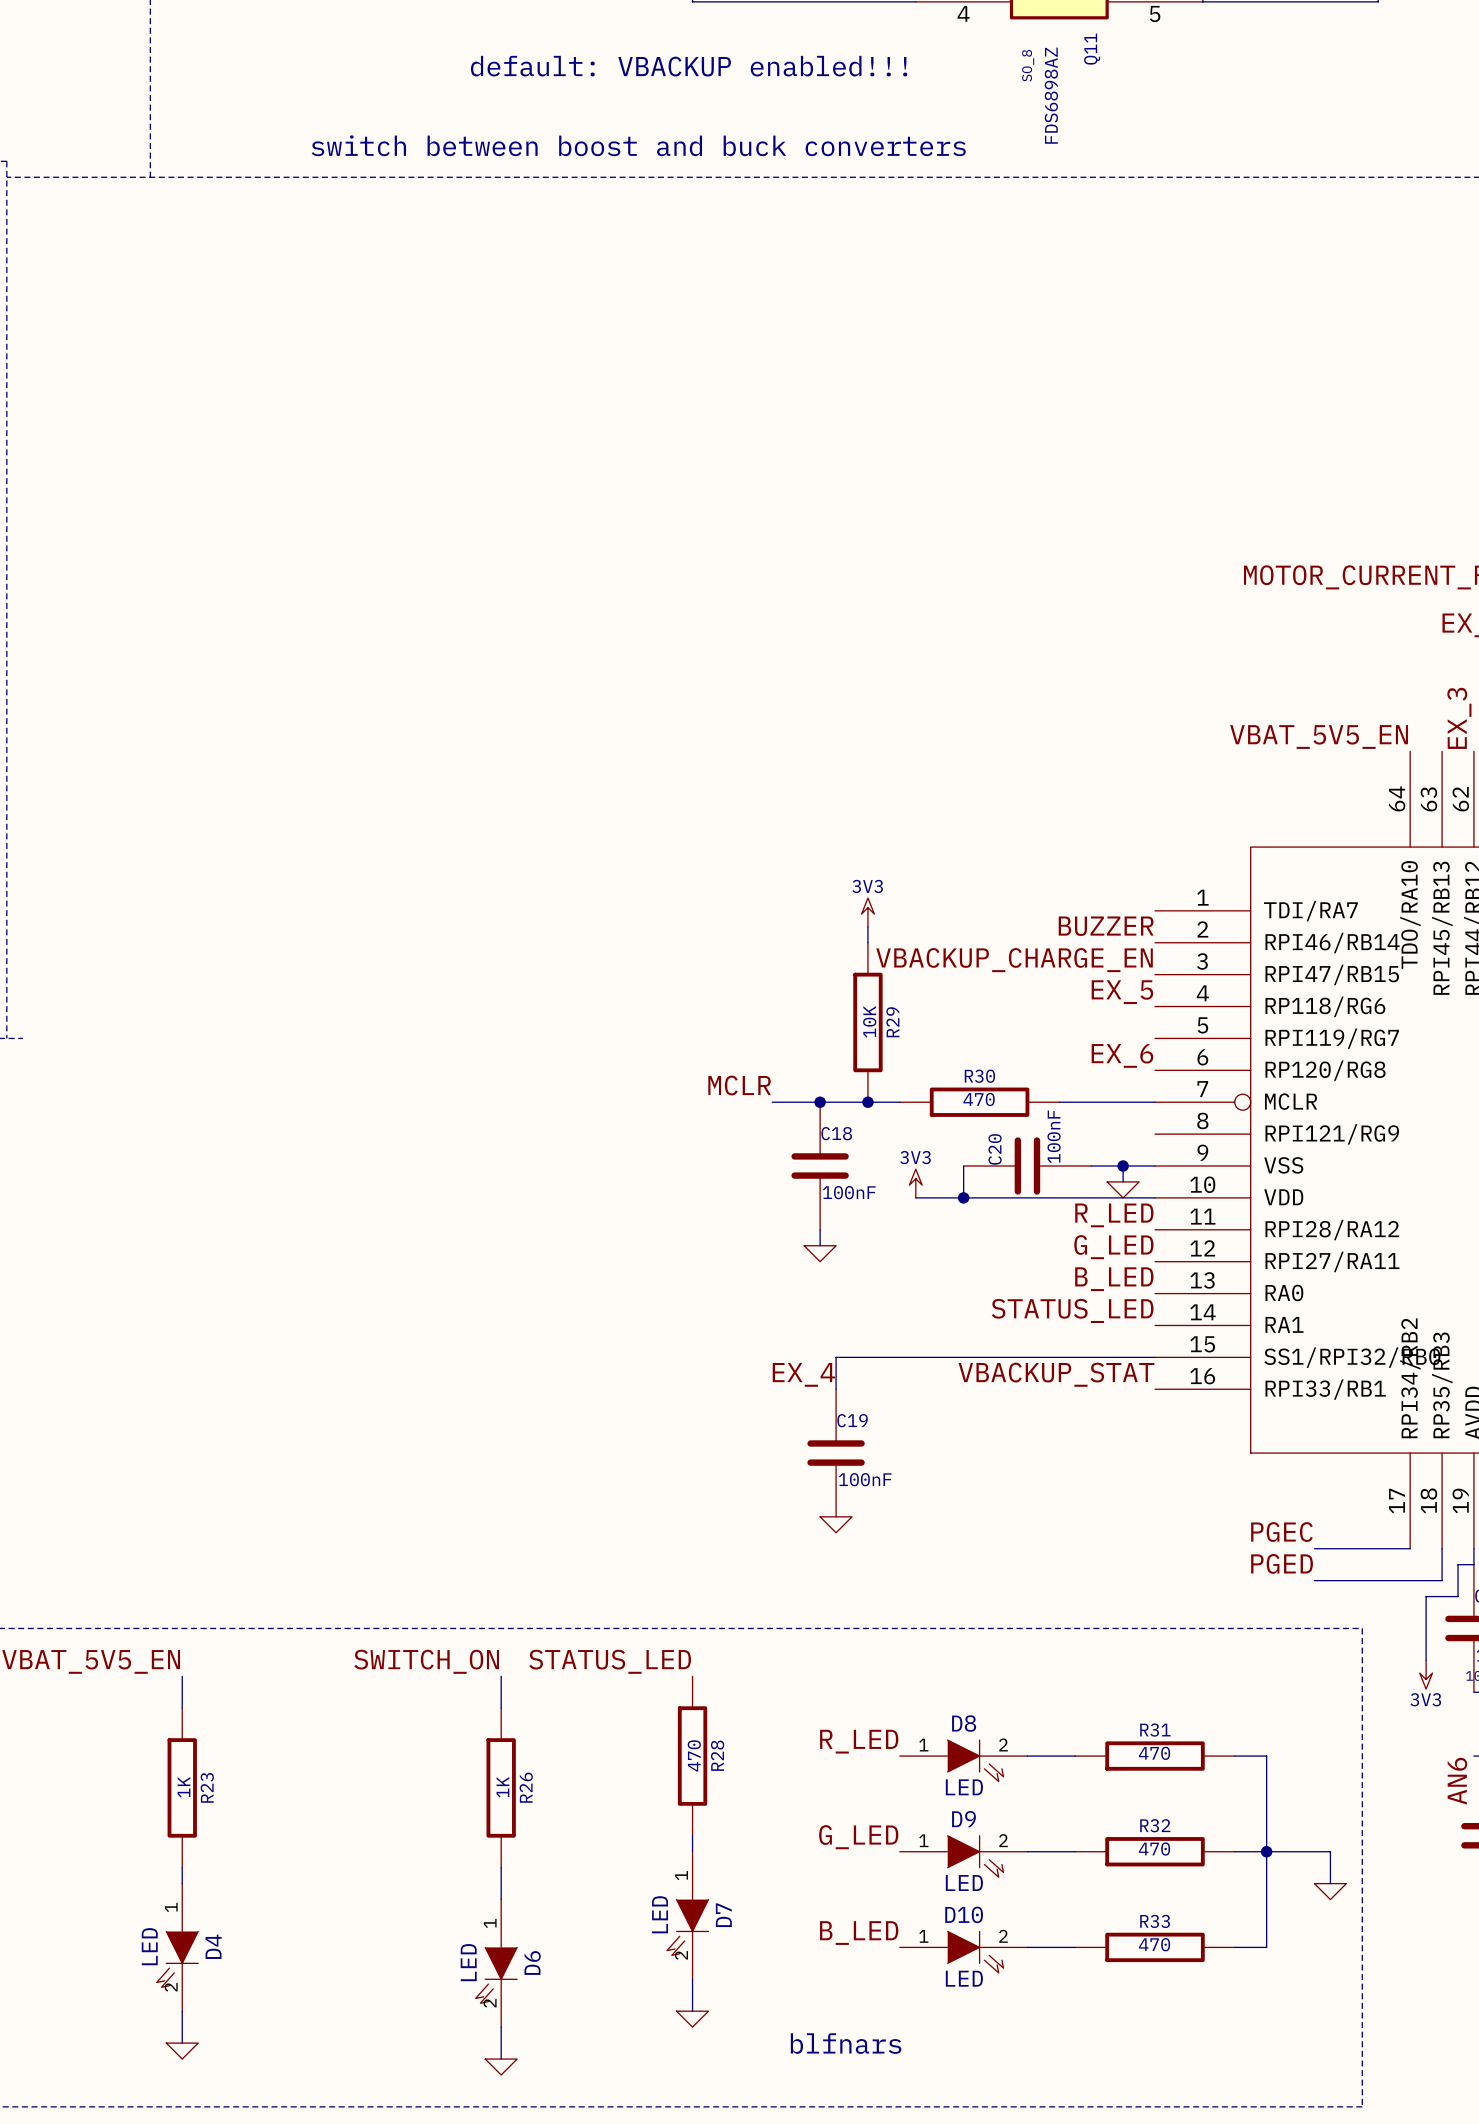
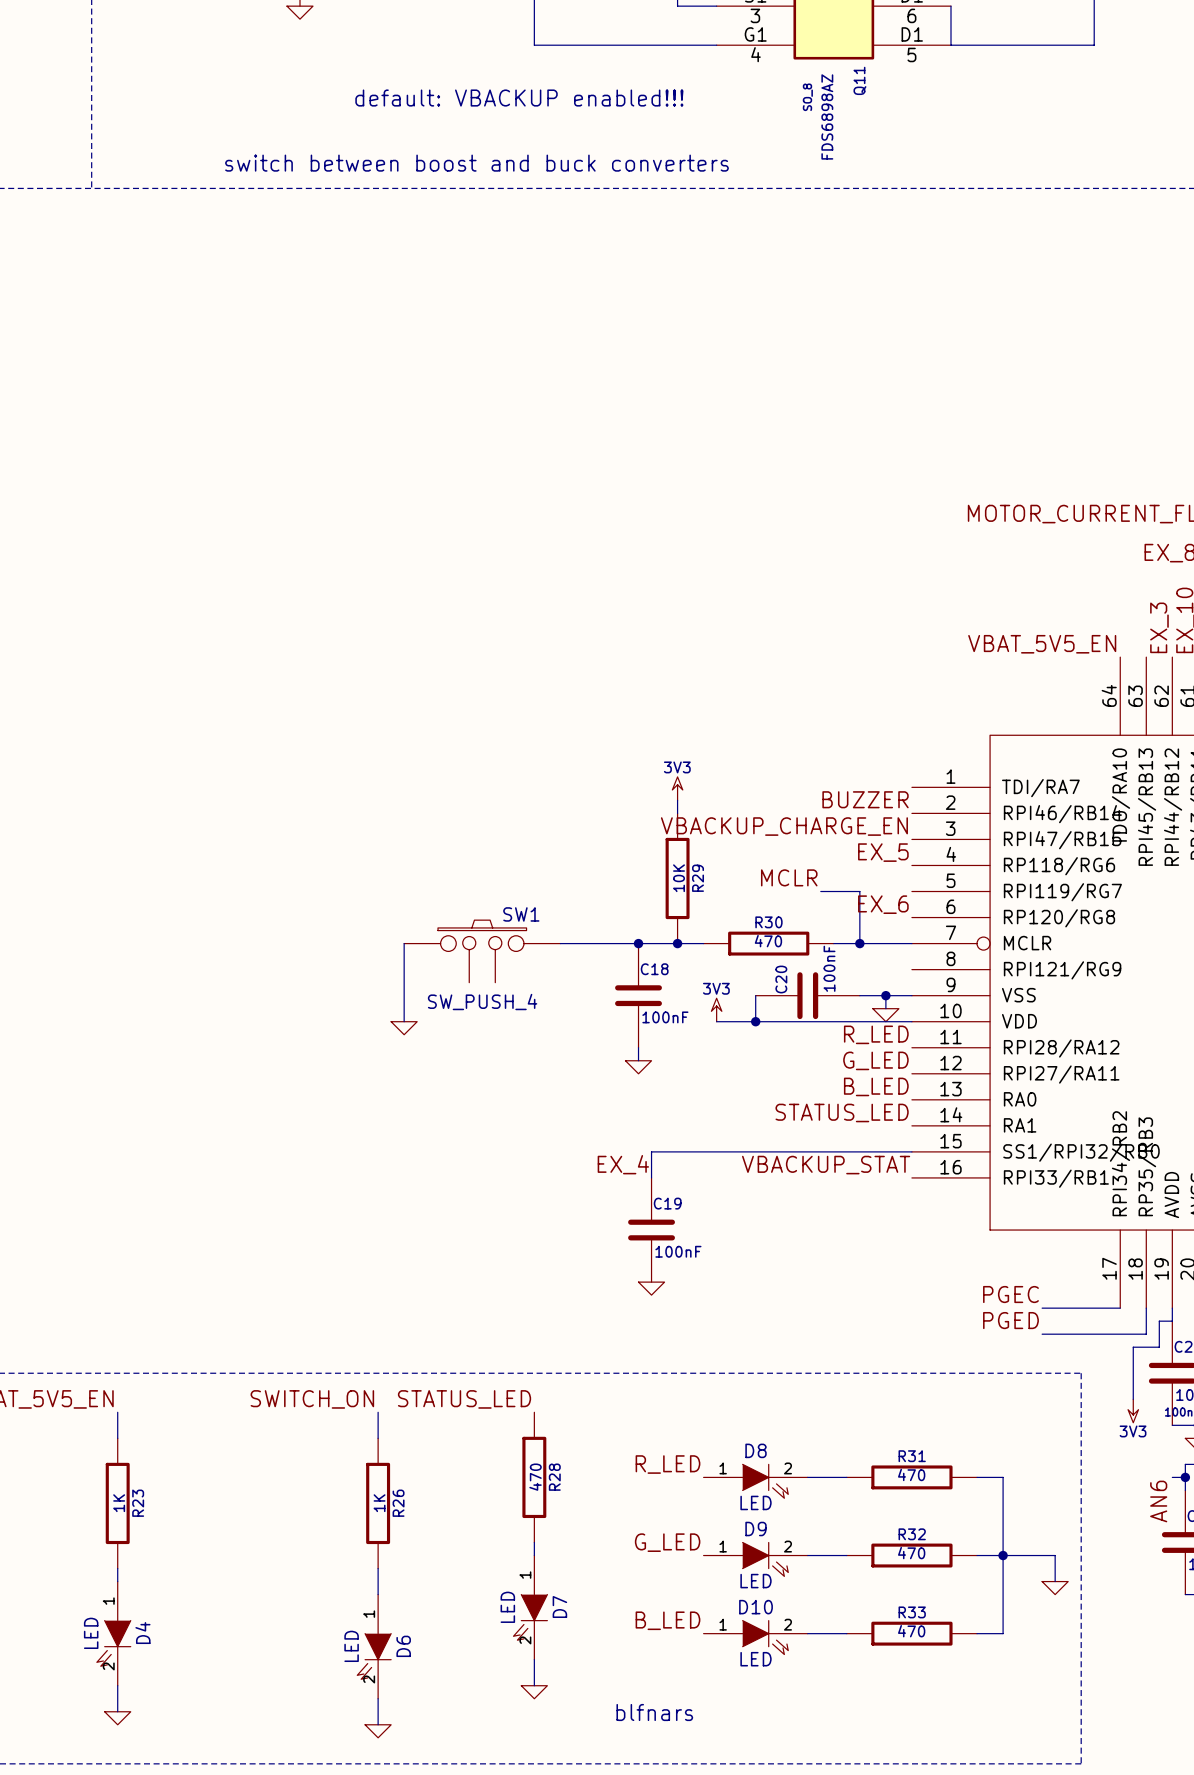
wire: none -> (820, 891) (859, 891) (859, 943)
label position: MCLR (739, 1085) -> MCLR (789, 877)
wire: none -> (404, 943) (404, 1021)
wire: none -> (560, 943) (599, 943)
junction: none -> (859, 943)
SW1: none -> SW_PUSH_4 (482, 951)
power symbol: none -> (404, 1028)

